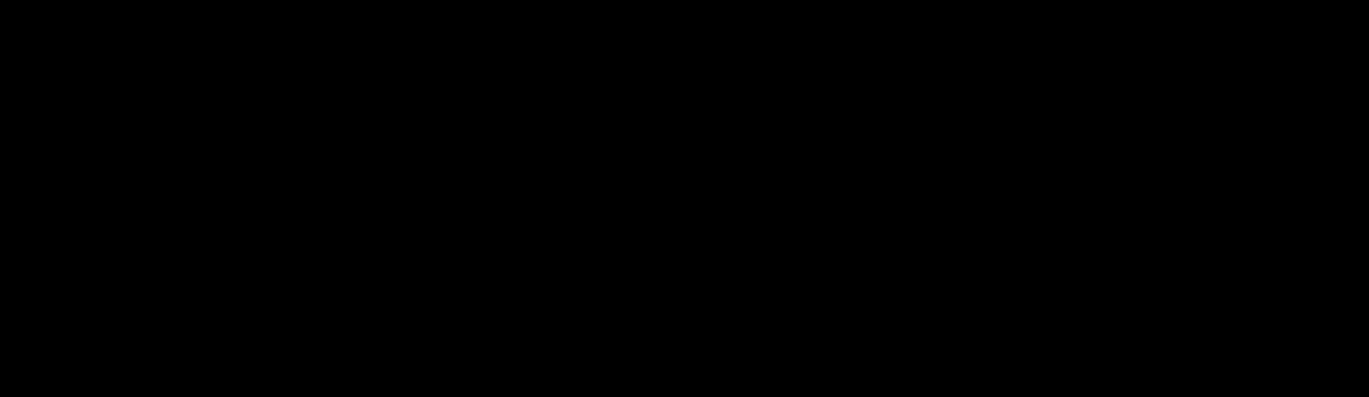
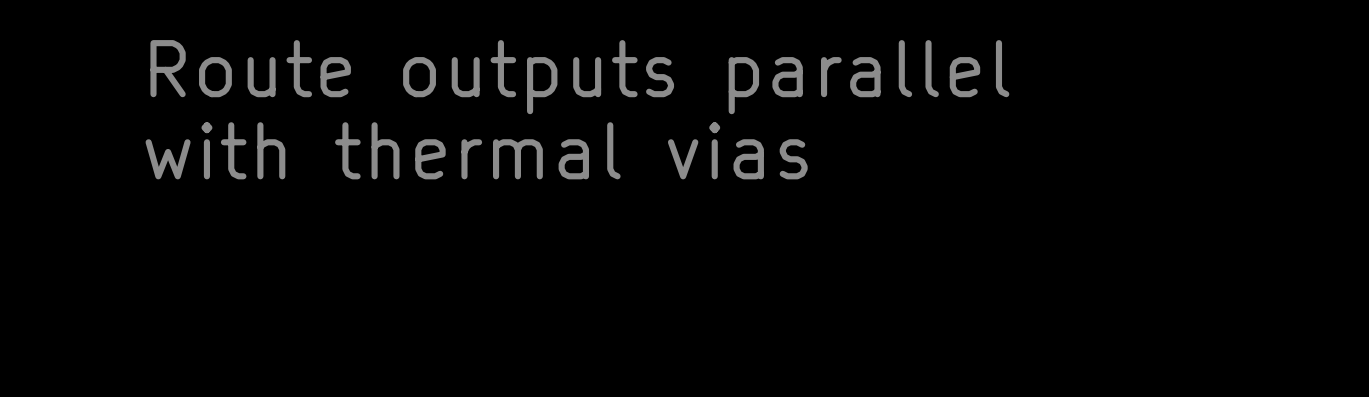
text: none -> Route outputs parallel (579, 77)
text: none -> with thermal vias (476, 150)

